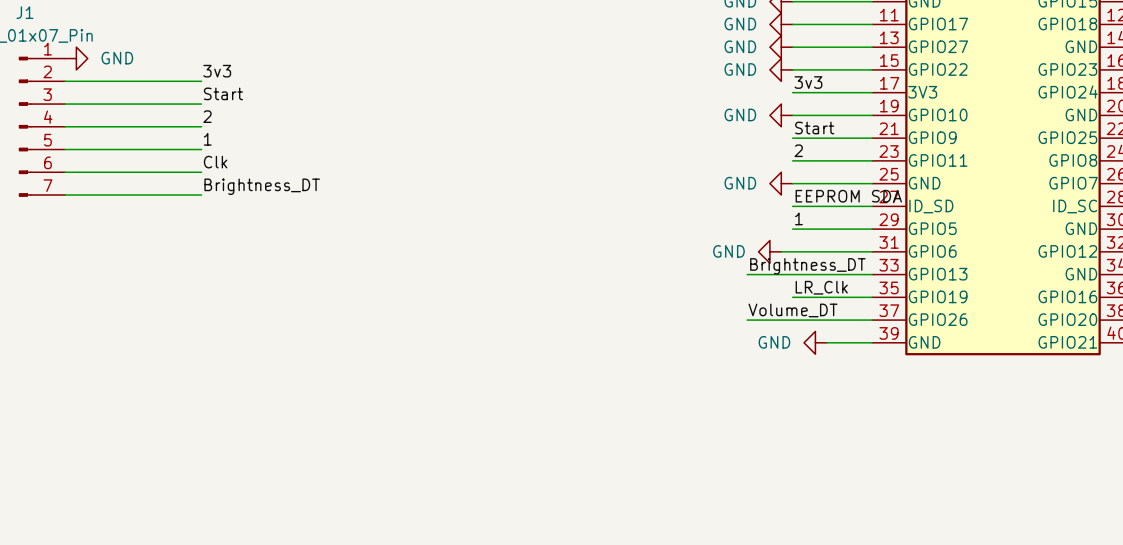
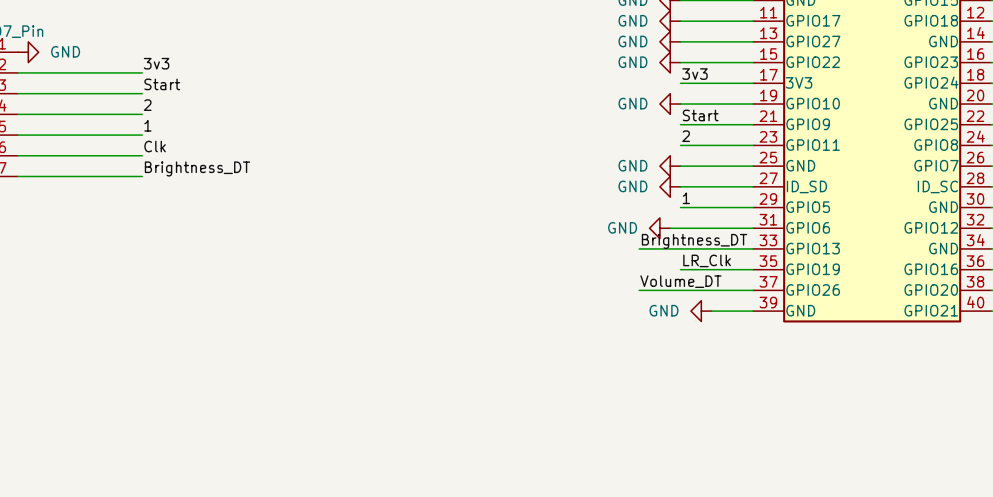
label: EEPROM SDA (848, 196) -> none
power symbol: none -> GND (670, 186)

